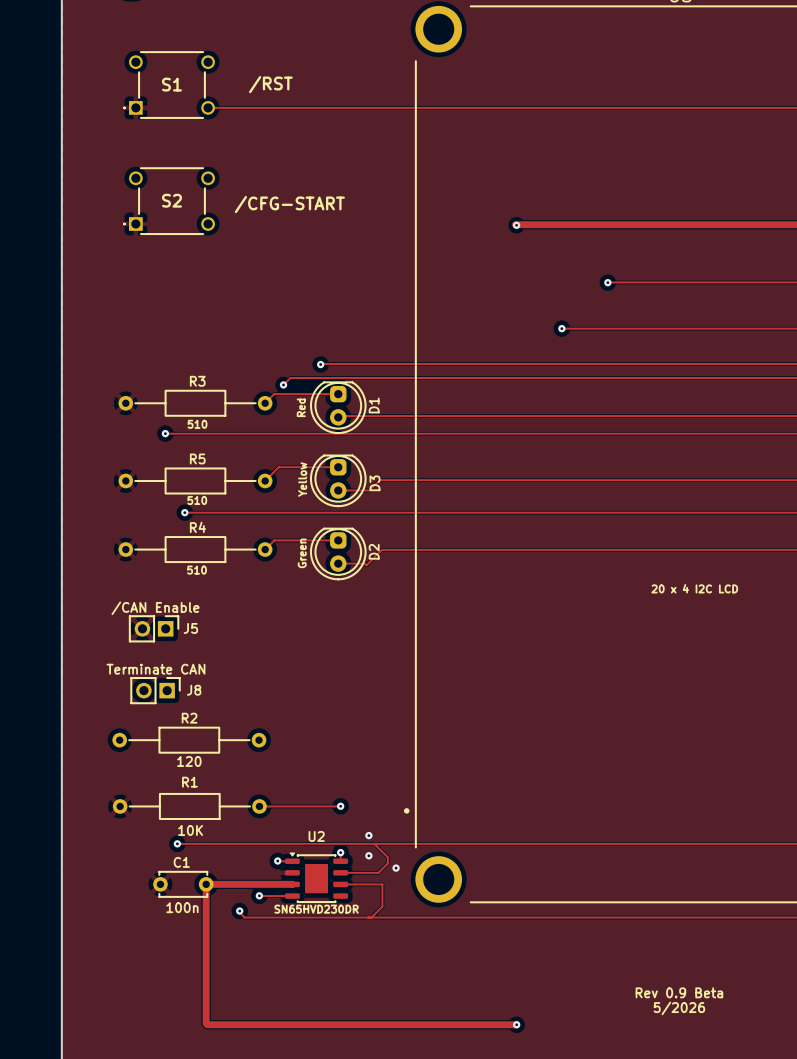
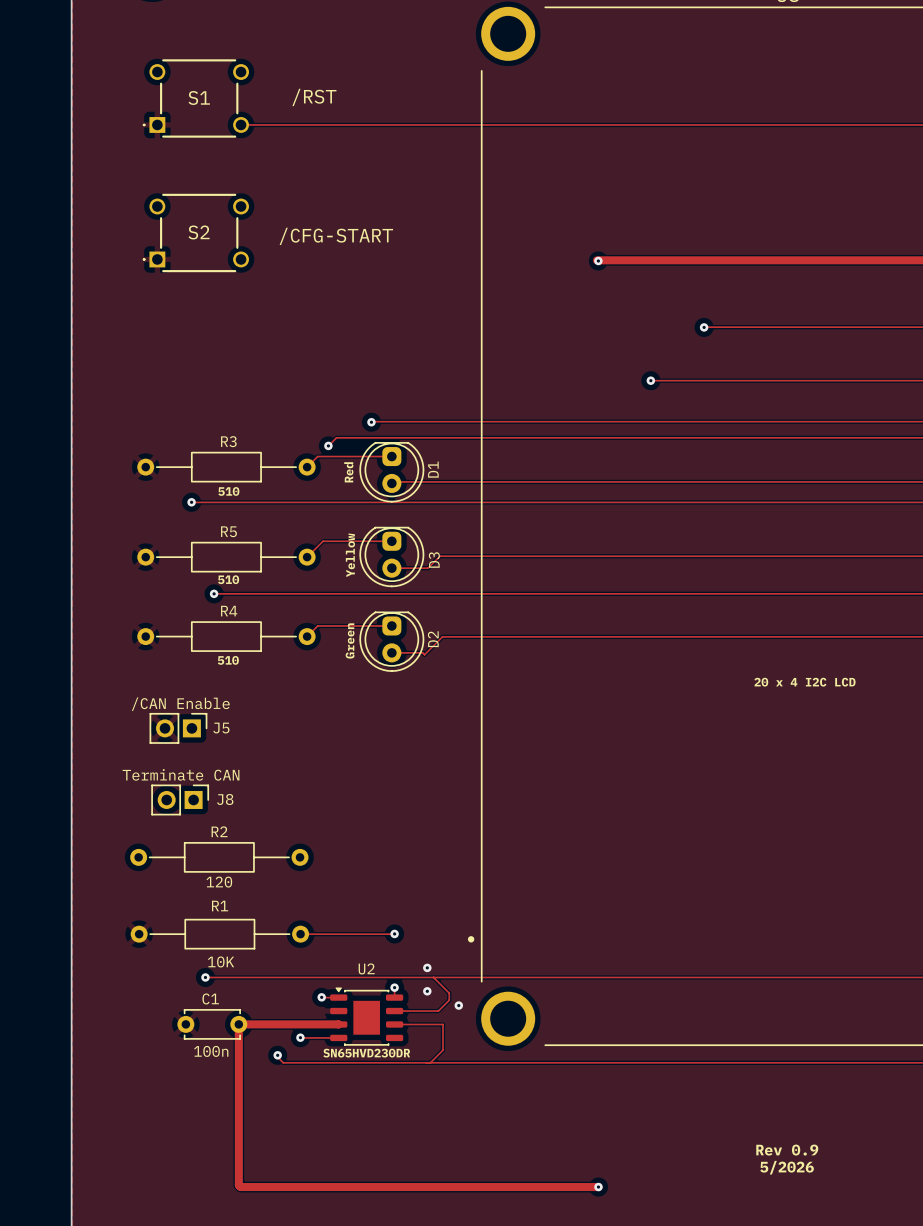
text: Rev 0.9 Beta (679, 992) -> Rev 0.9 (787, 1150)

